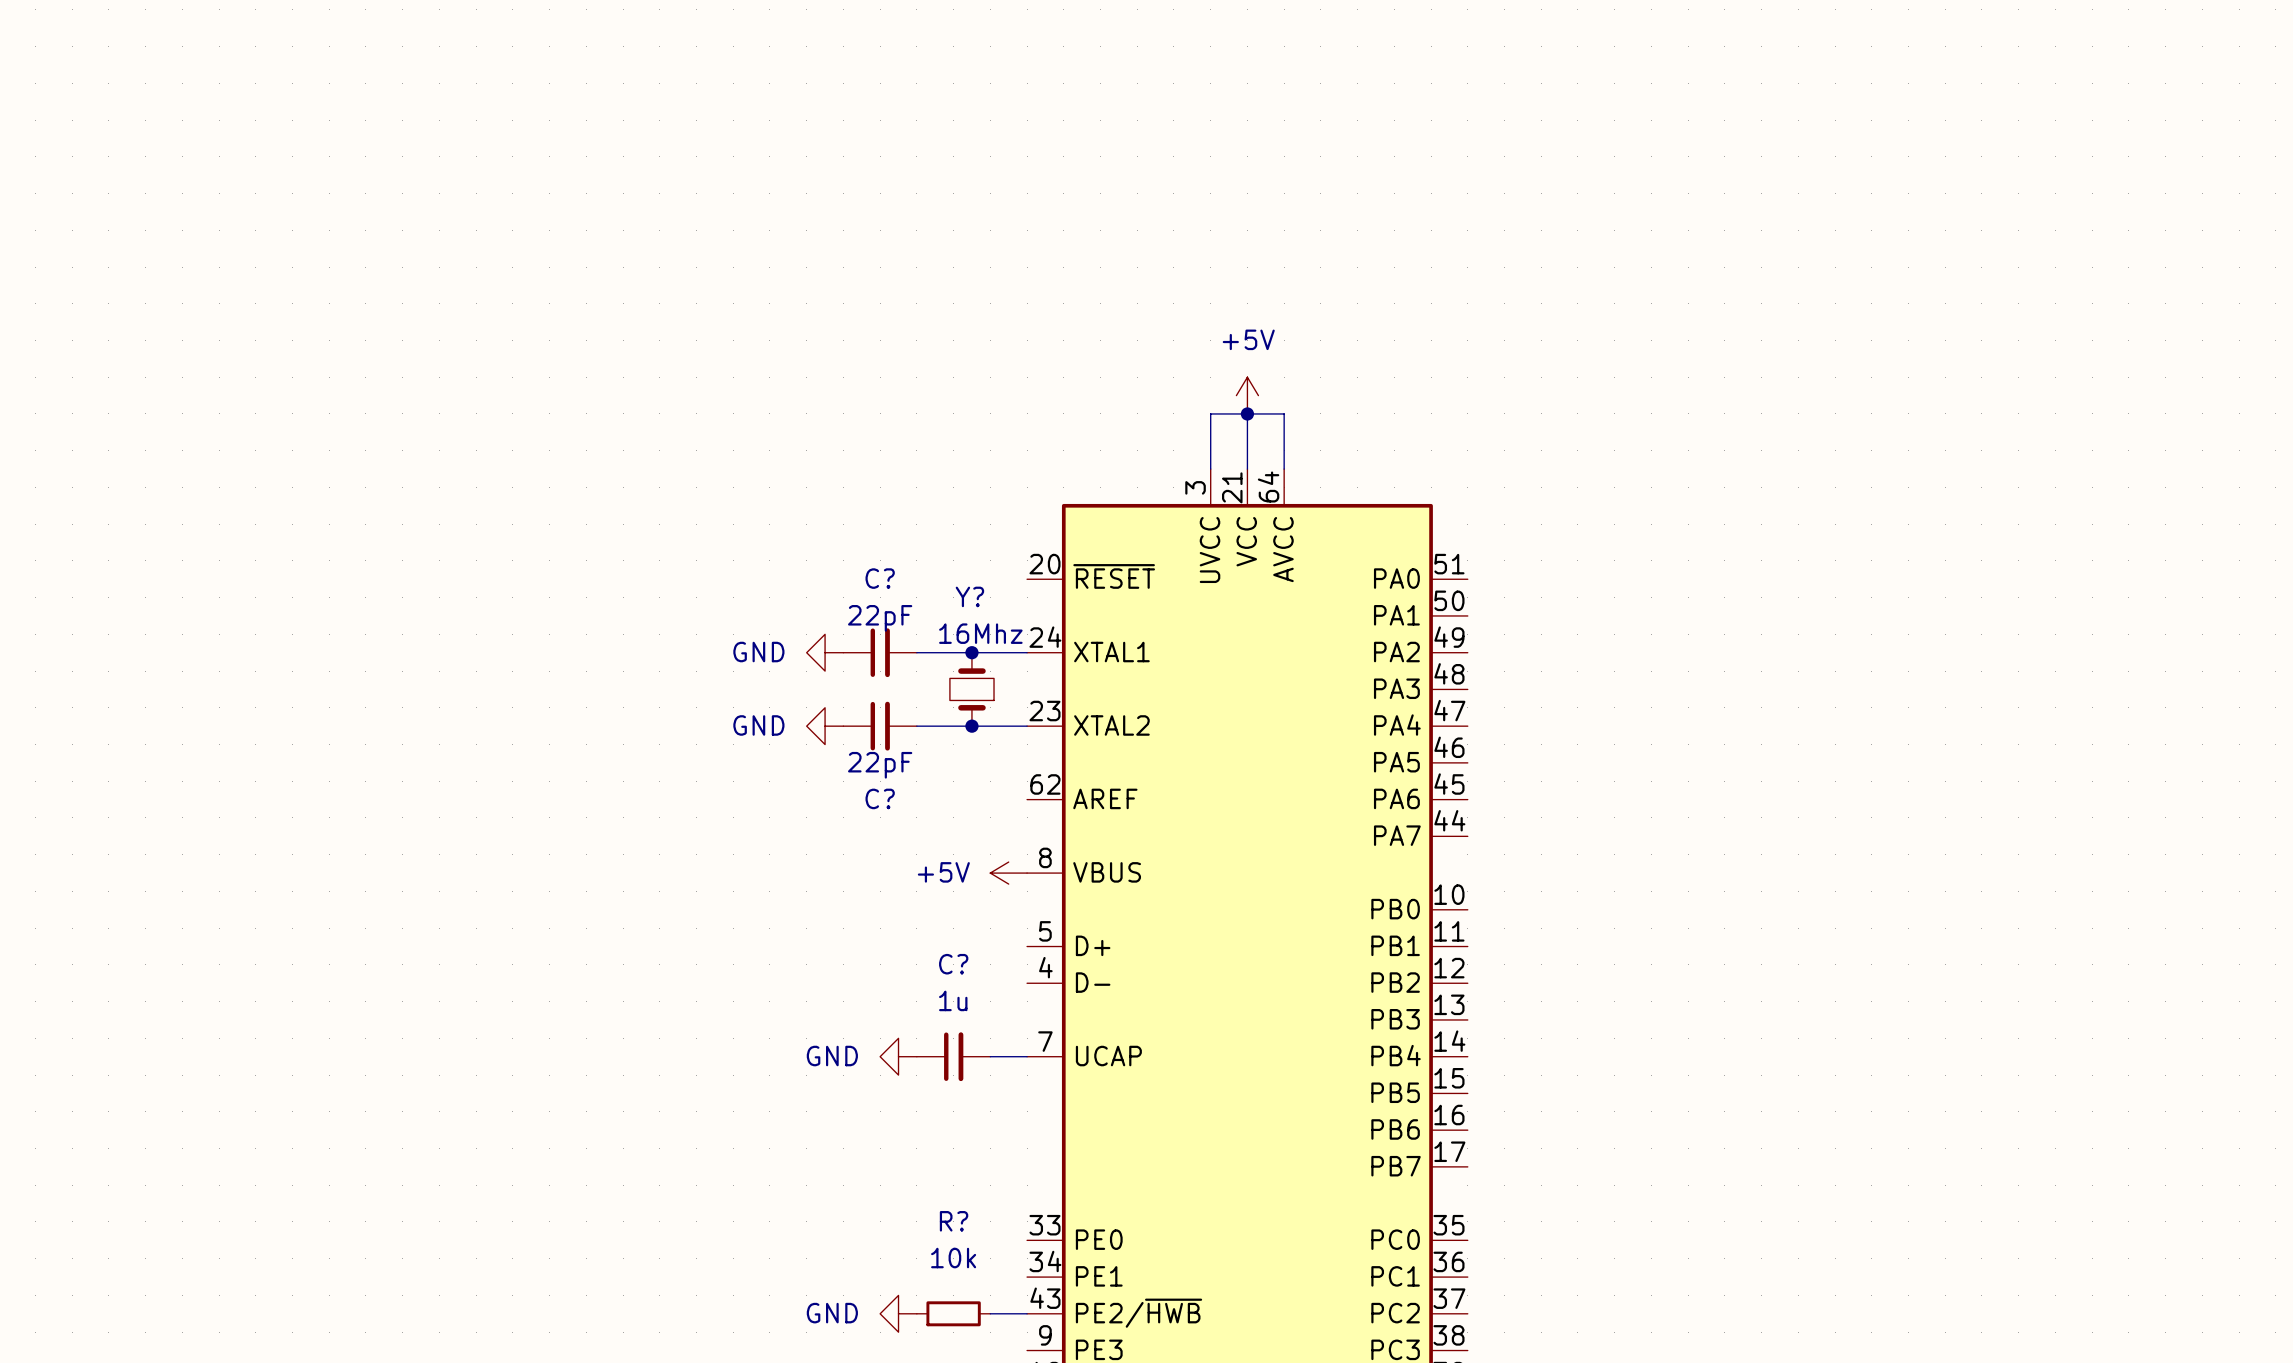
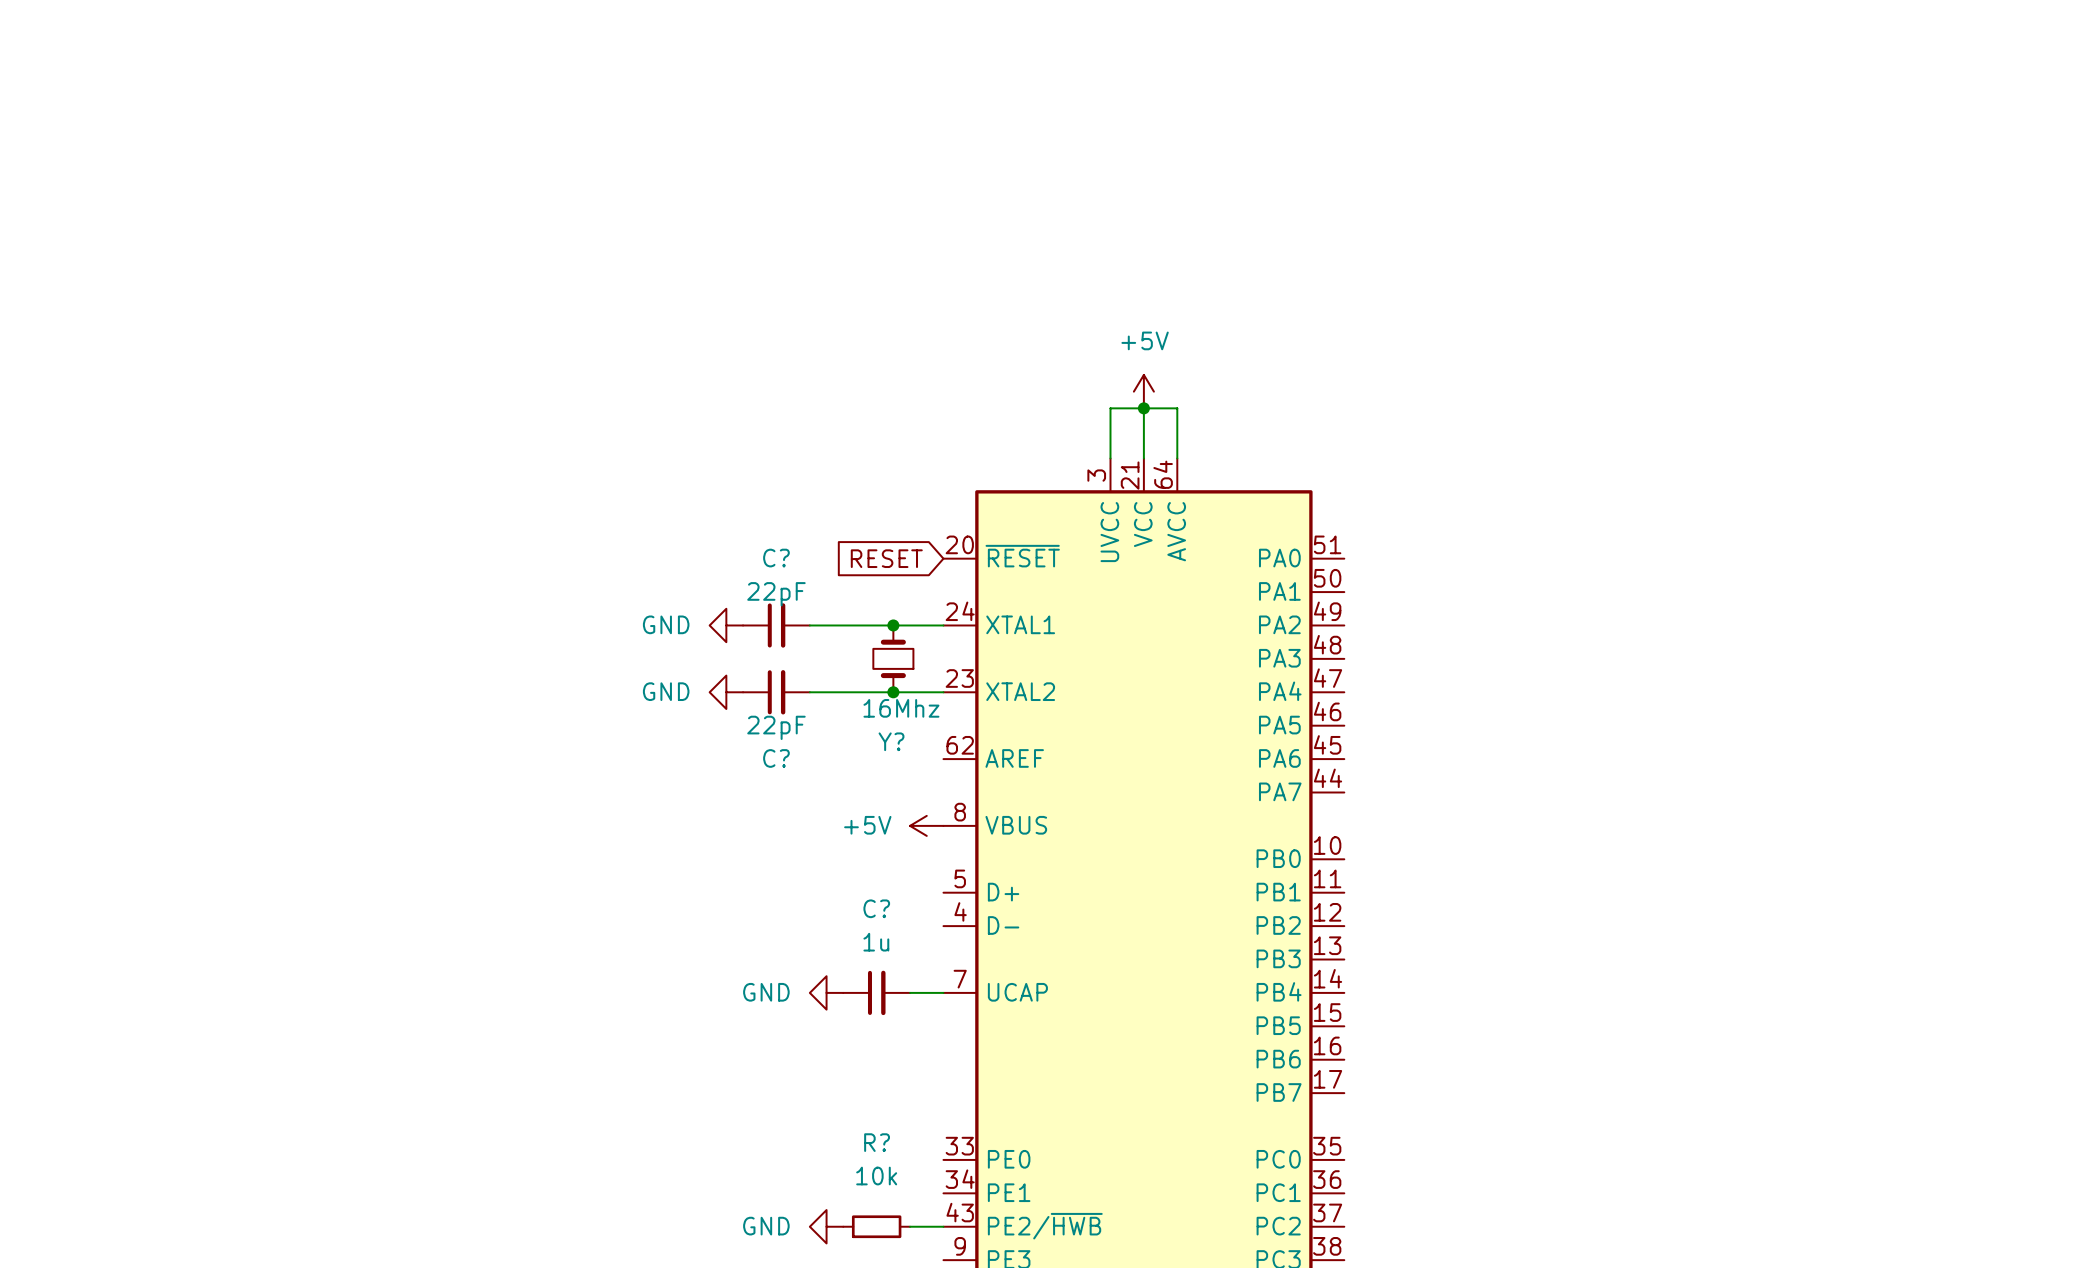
global label: none -> RESET (886, 558)
Y? name position: Y? (969, 596) -> Y? (891, 741)
Y? value position: 16Mhz (980, 633) -> 16Mhz (901, 708)
power symbol position: GND (825, 652) -> GND (726, 625)
C? position: (880, 652) -> (776, 625)
power symbol position: GND (825, 726) -> GND (726, 692)
C? position: (880, 726) -> (776, 692)

